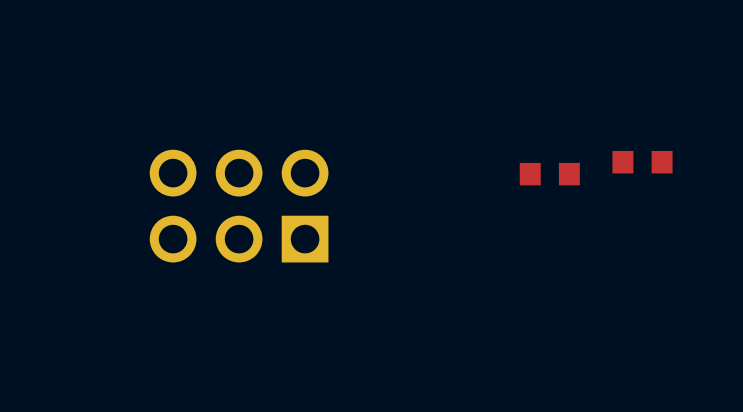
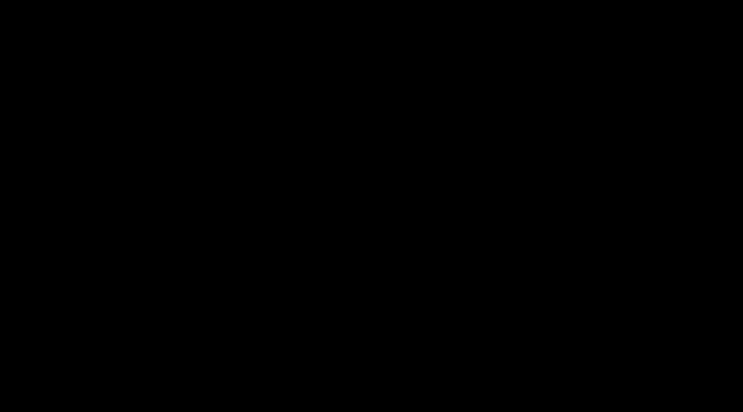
part: (642, 162) -> none
part: (549, 174) -> none
part: (239, 206) -> none

